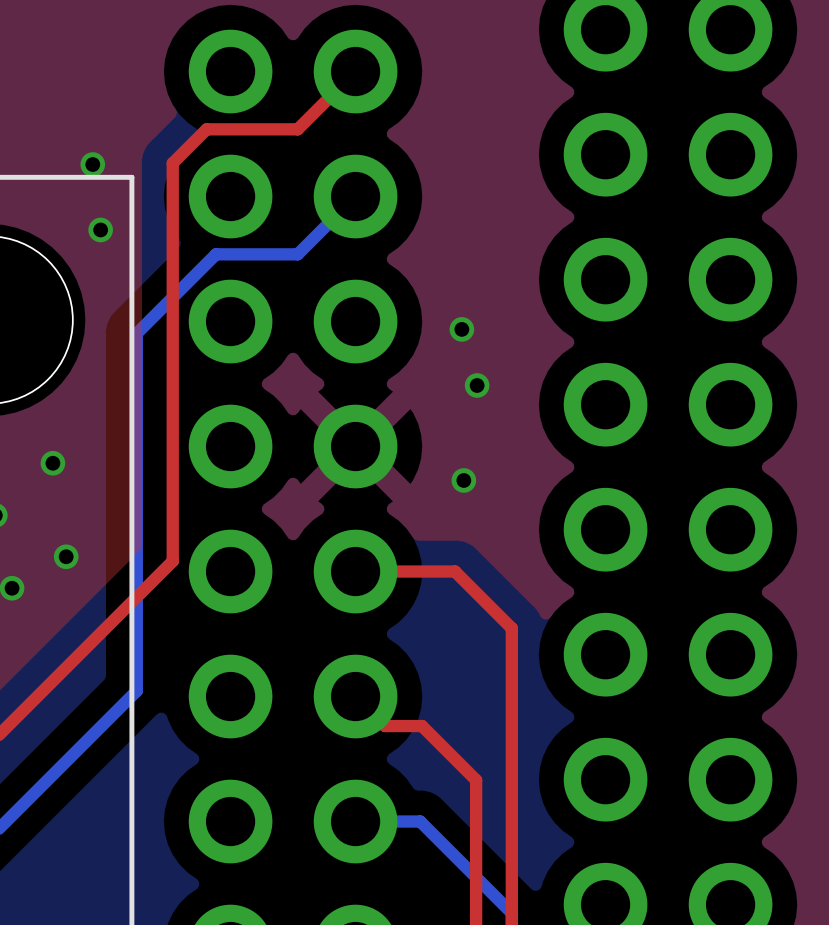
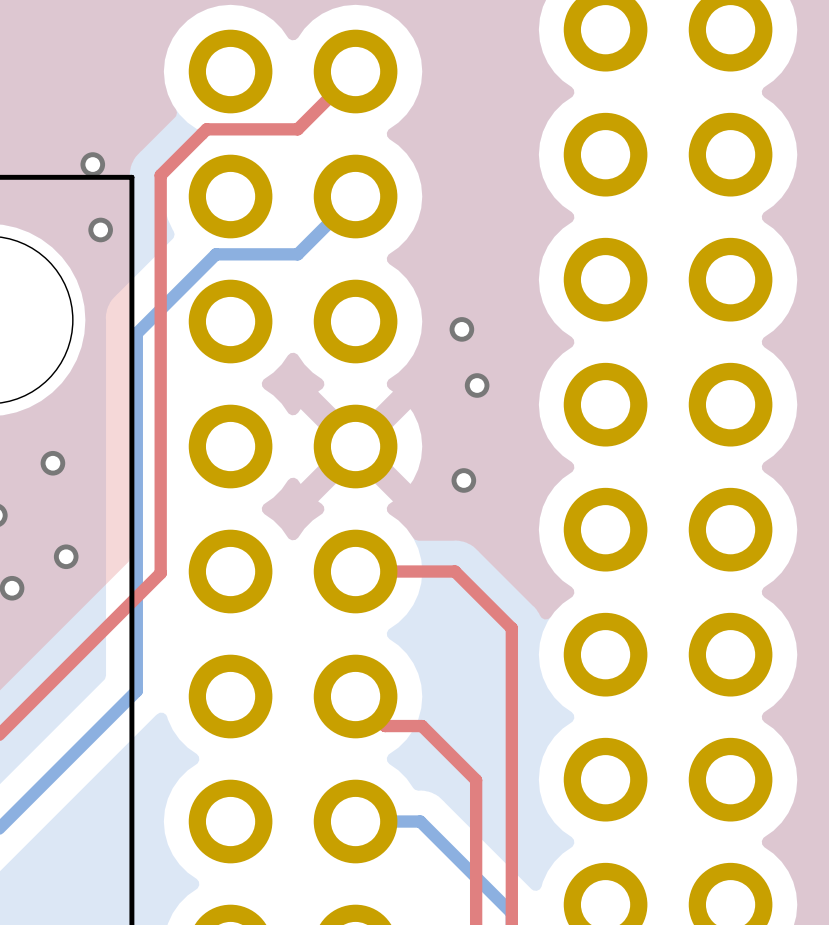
top track: (172, 163) (172, 561) (160, 573) -> (172, 163) (160, 175) (160, 573)

